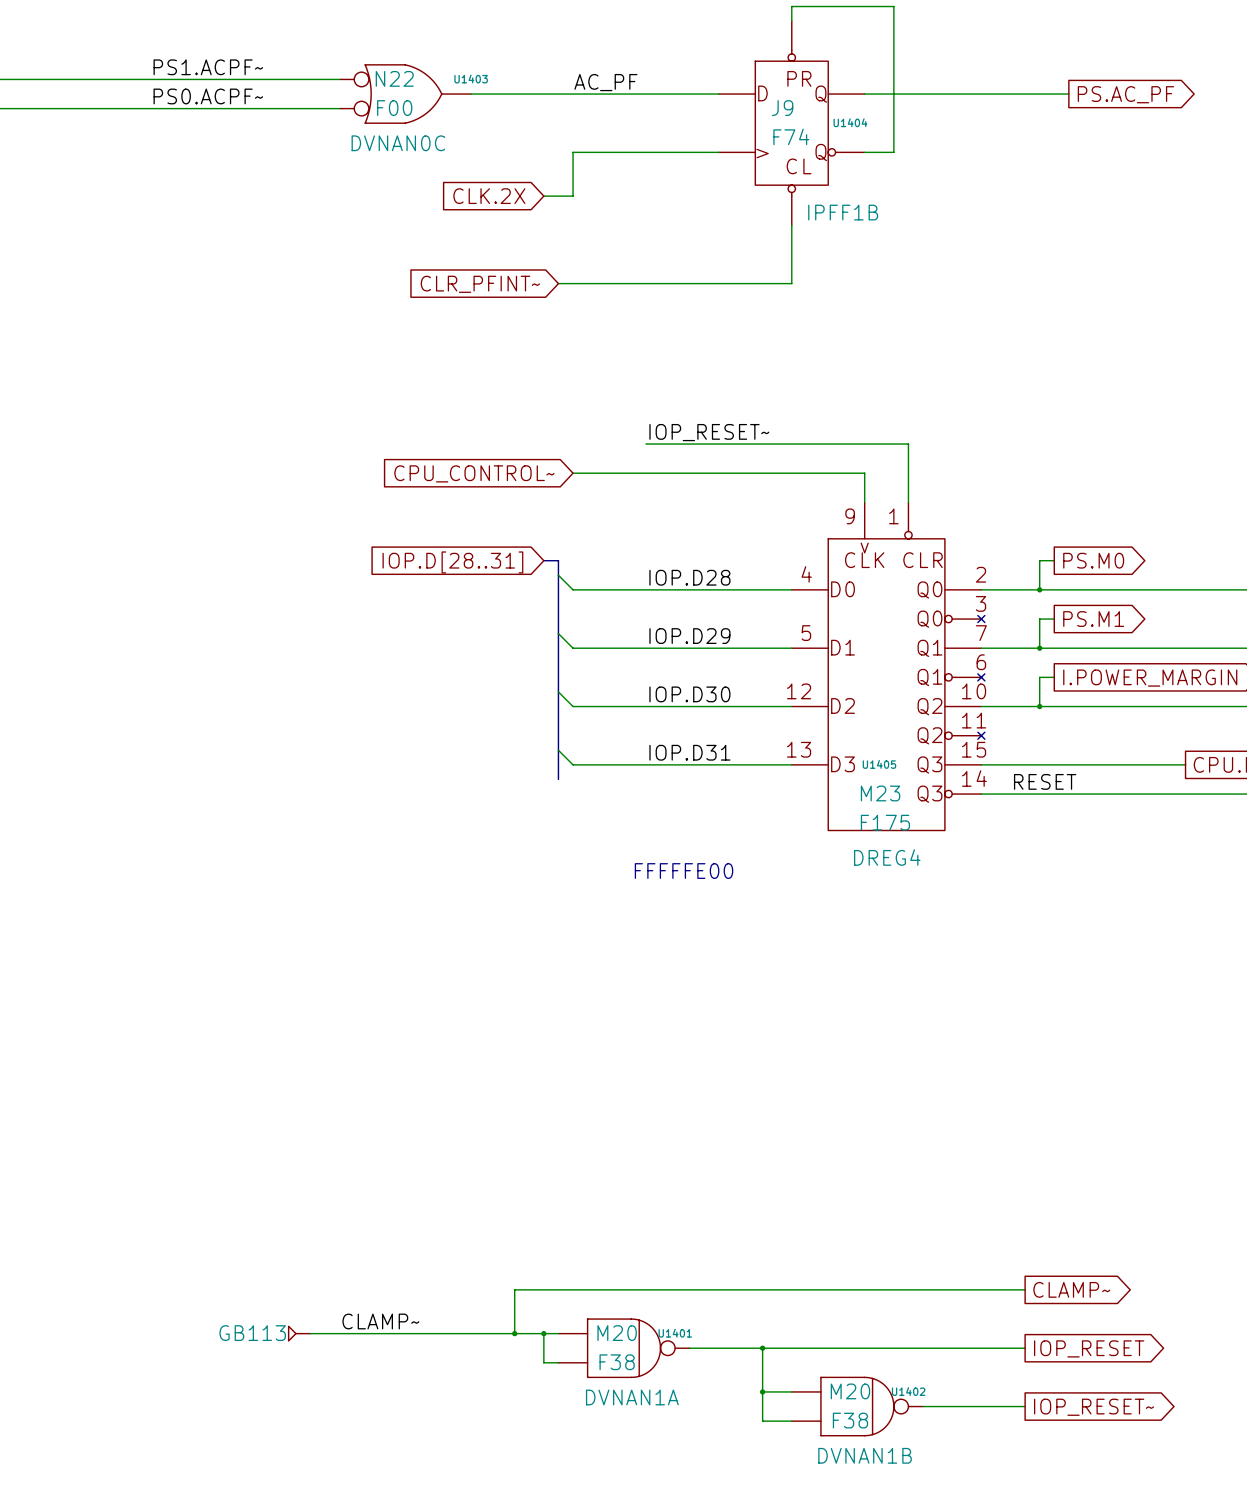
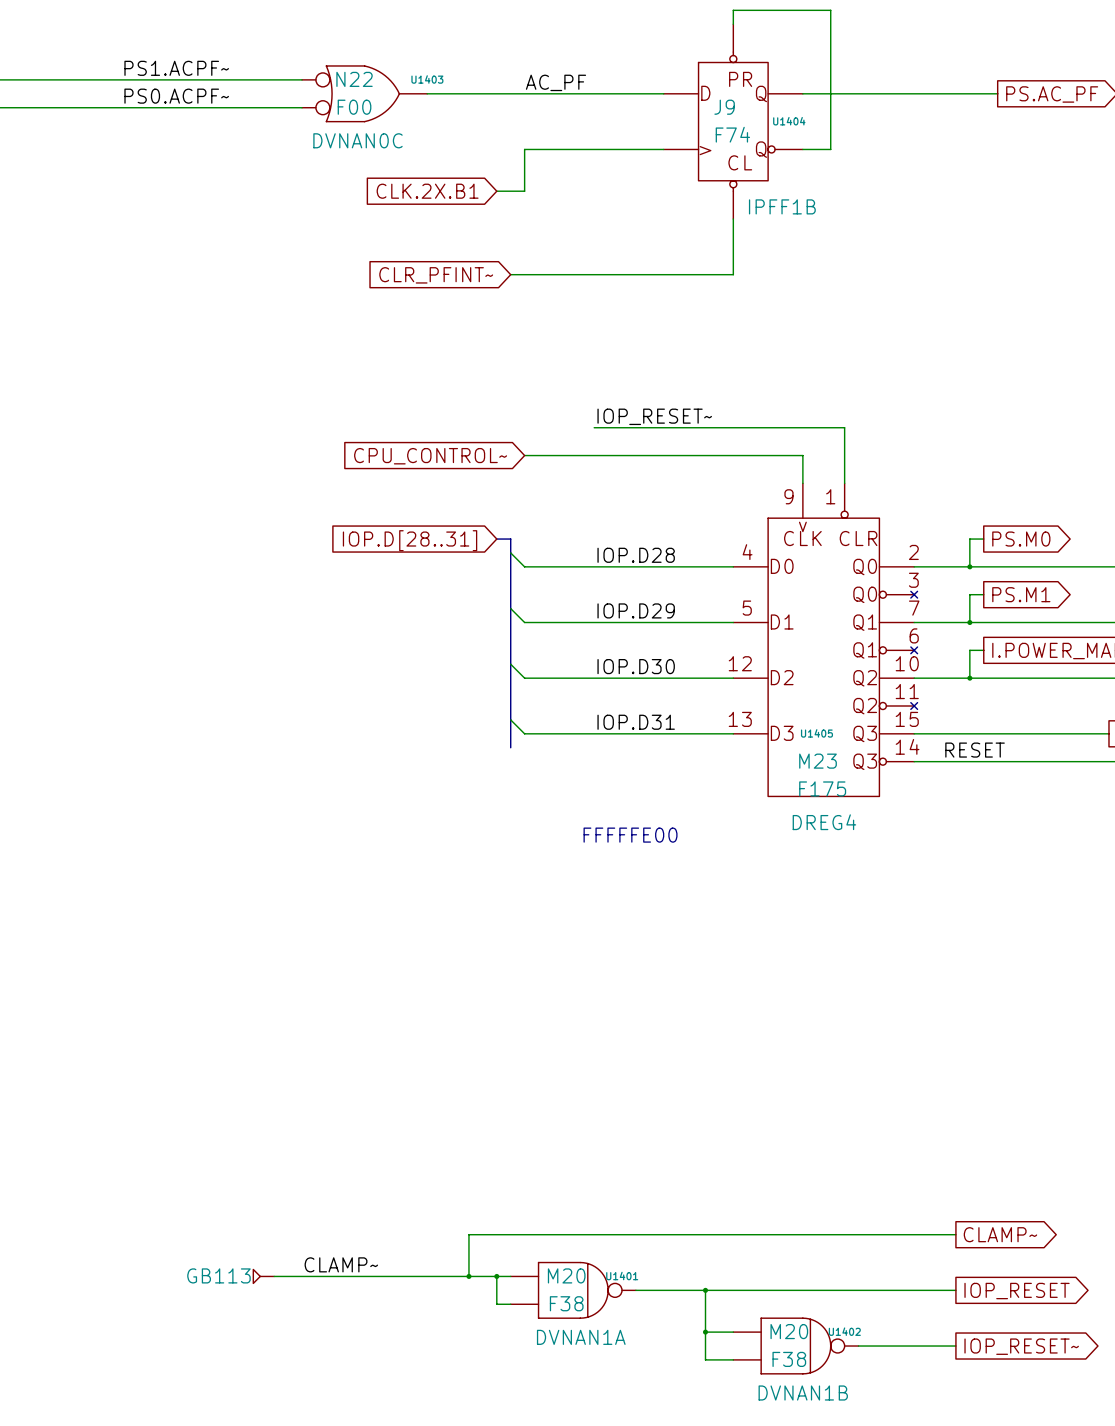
global label: CLK.2X (489, 196) -> CLK.2X.B1 (427, 191)

